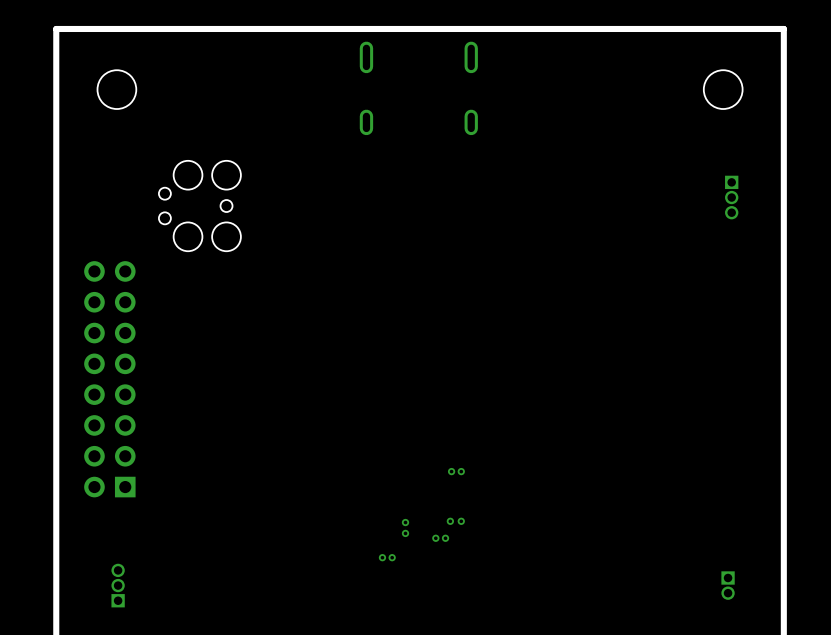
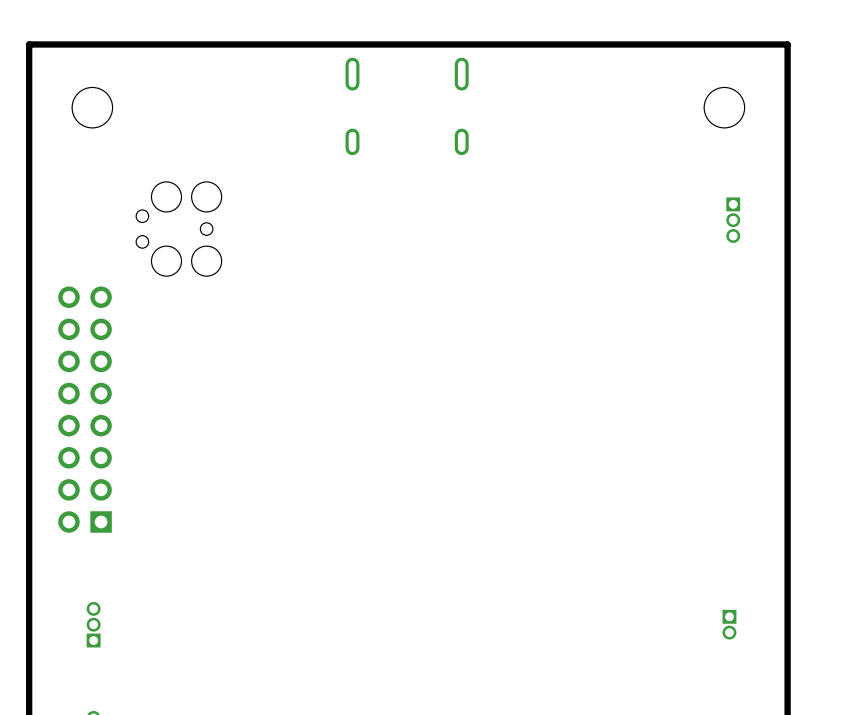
via: (451, 471) -> none
via: (461, 471) -> none
via: (450, 521) -> none
via: (461, 521) -> none
via: (405, 522) -> none
via: (405, 533) -> none
via: (435, 538) -> none
via: (445, 538) -> none
via: (382, 557) -> none
via: (392, 557) -> none

